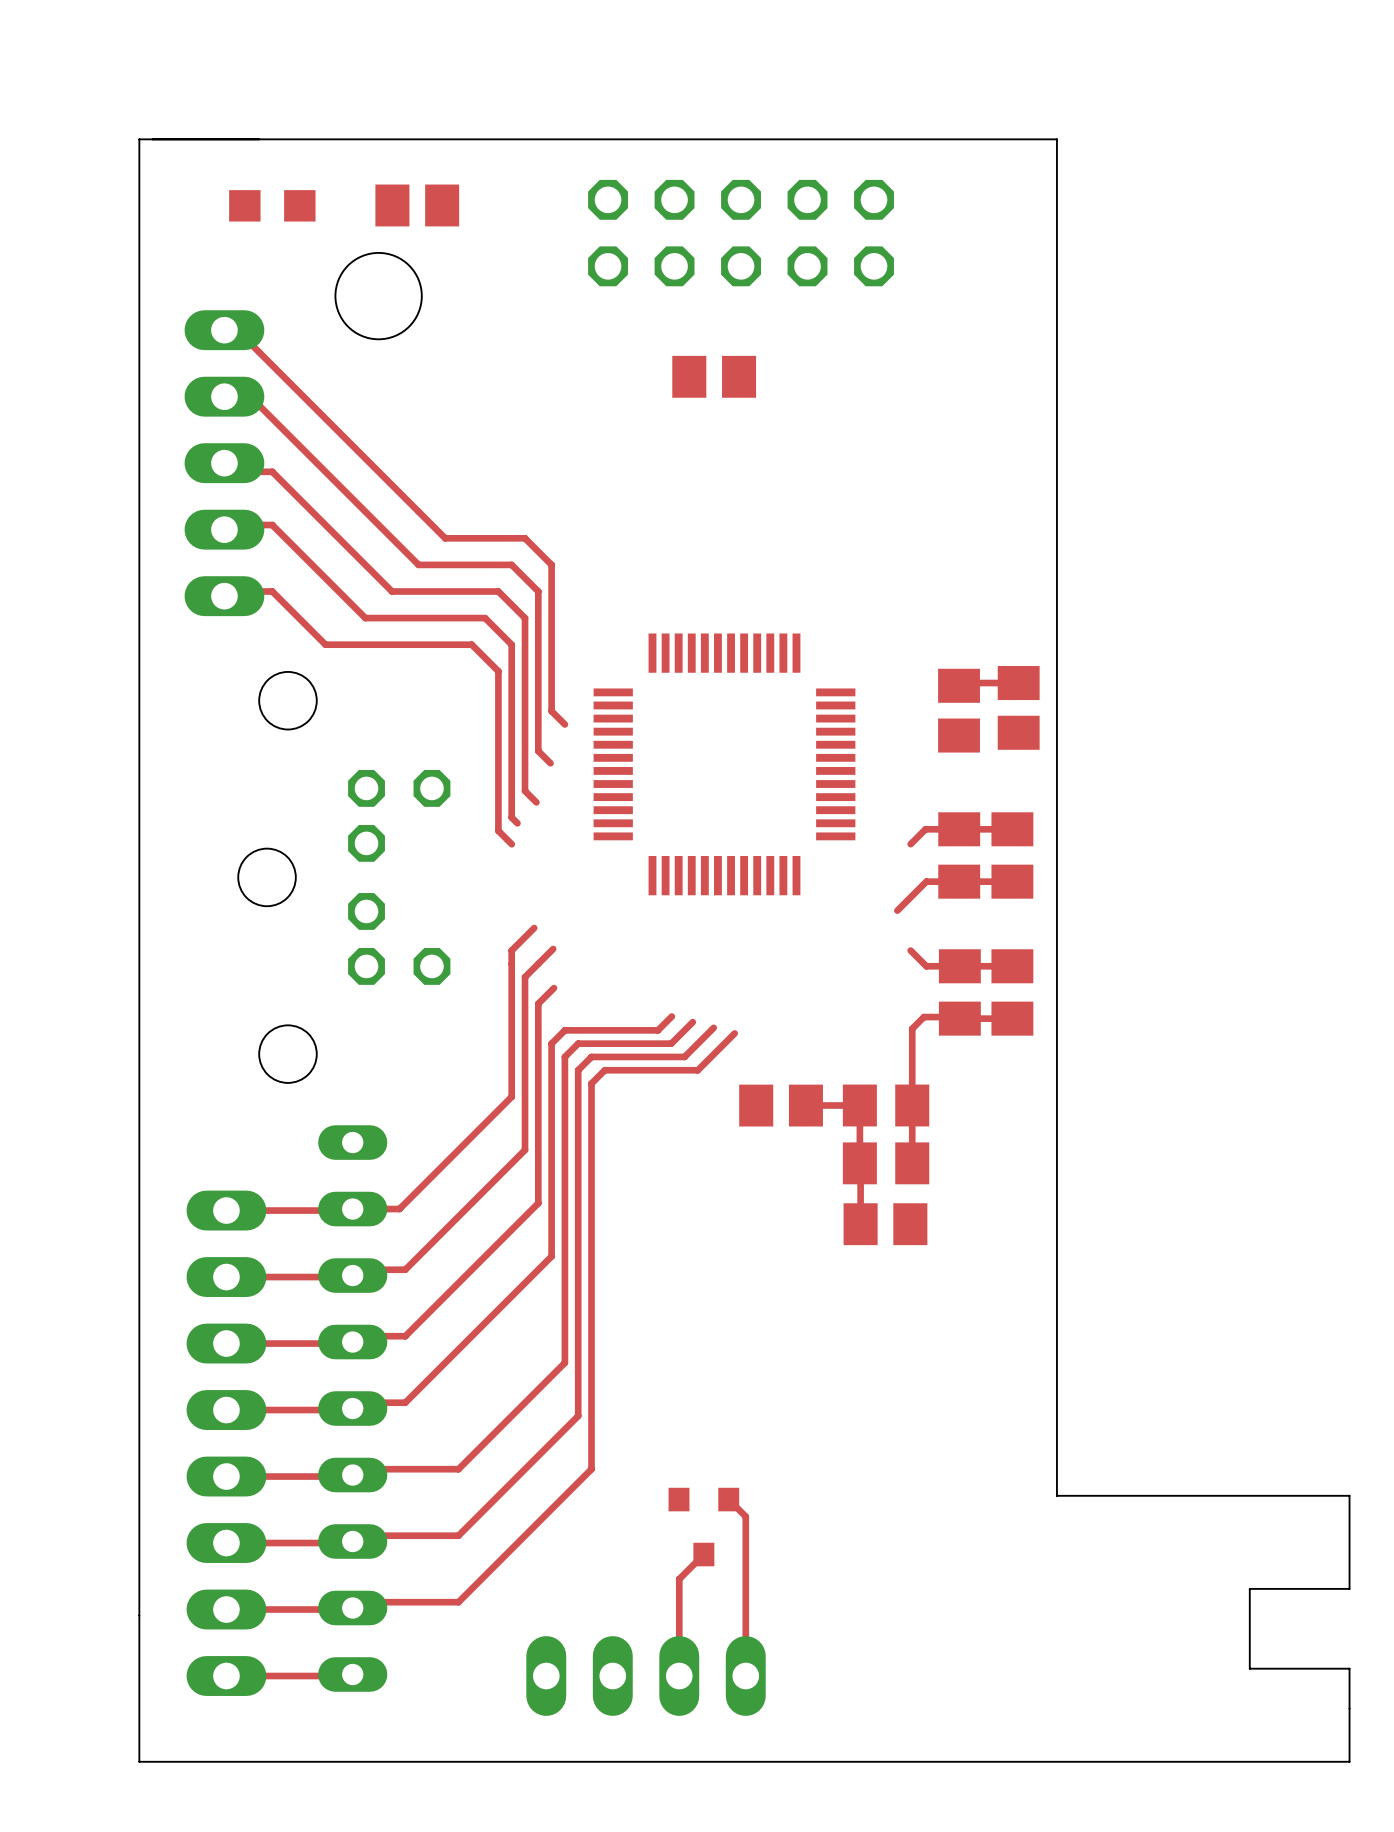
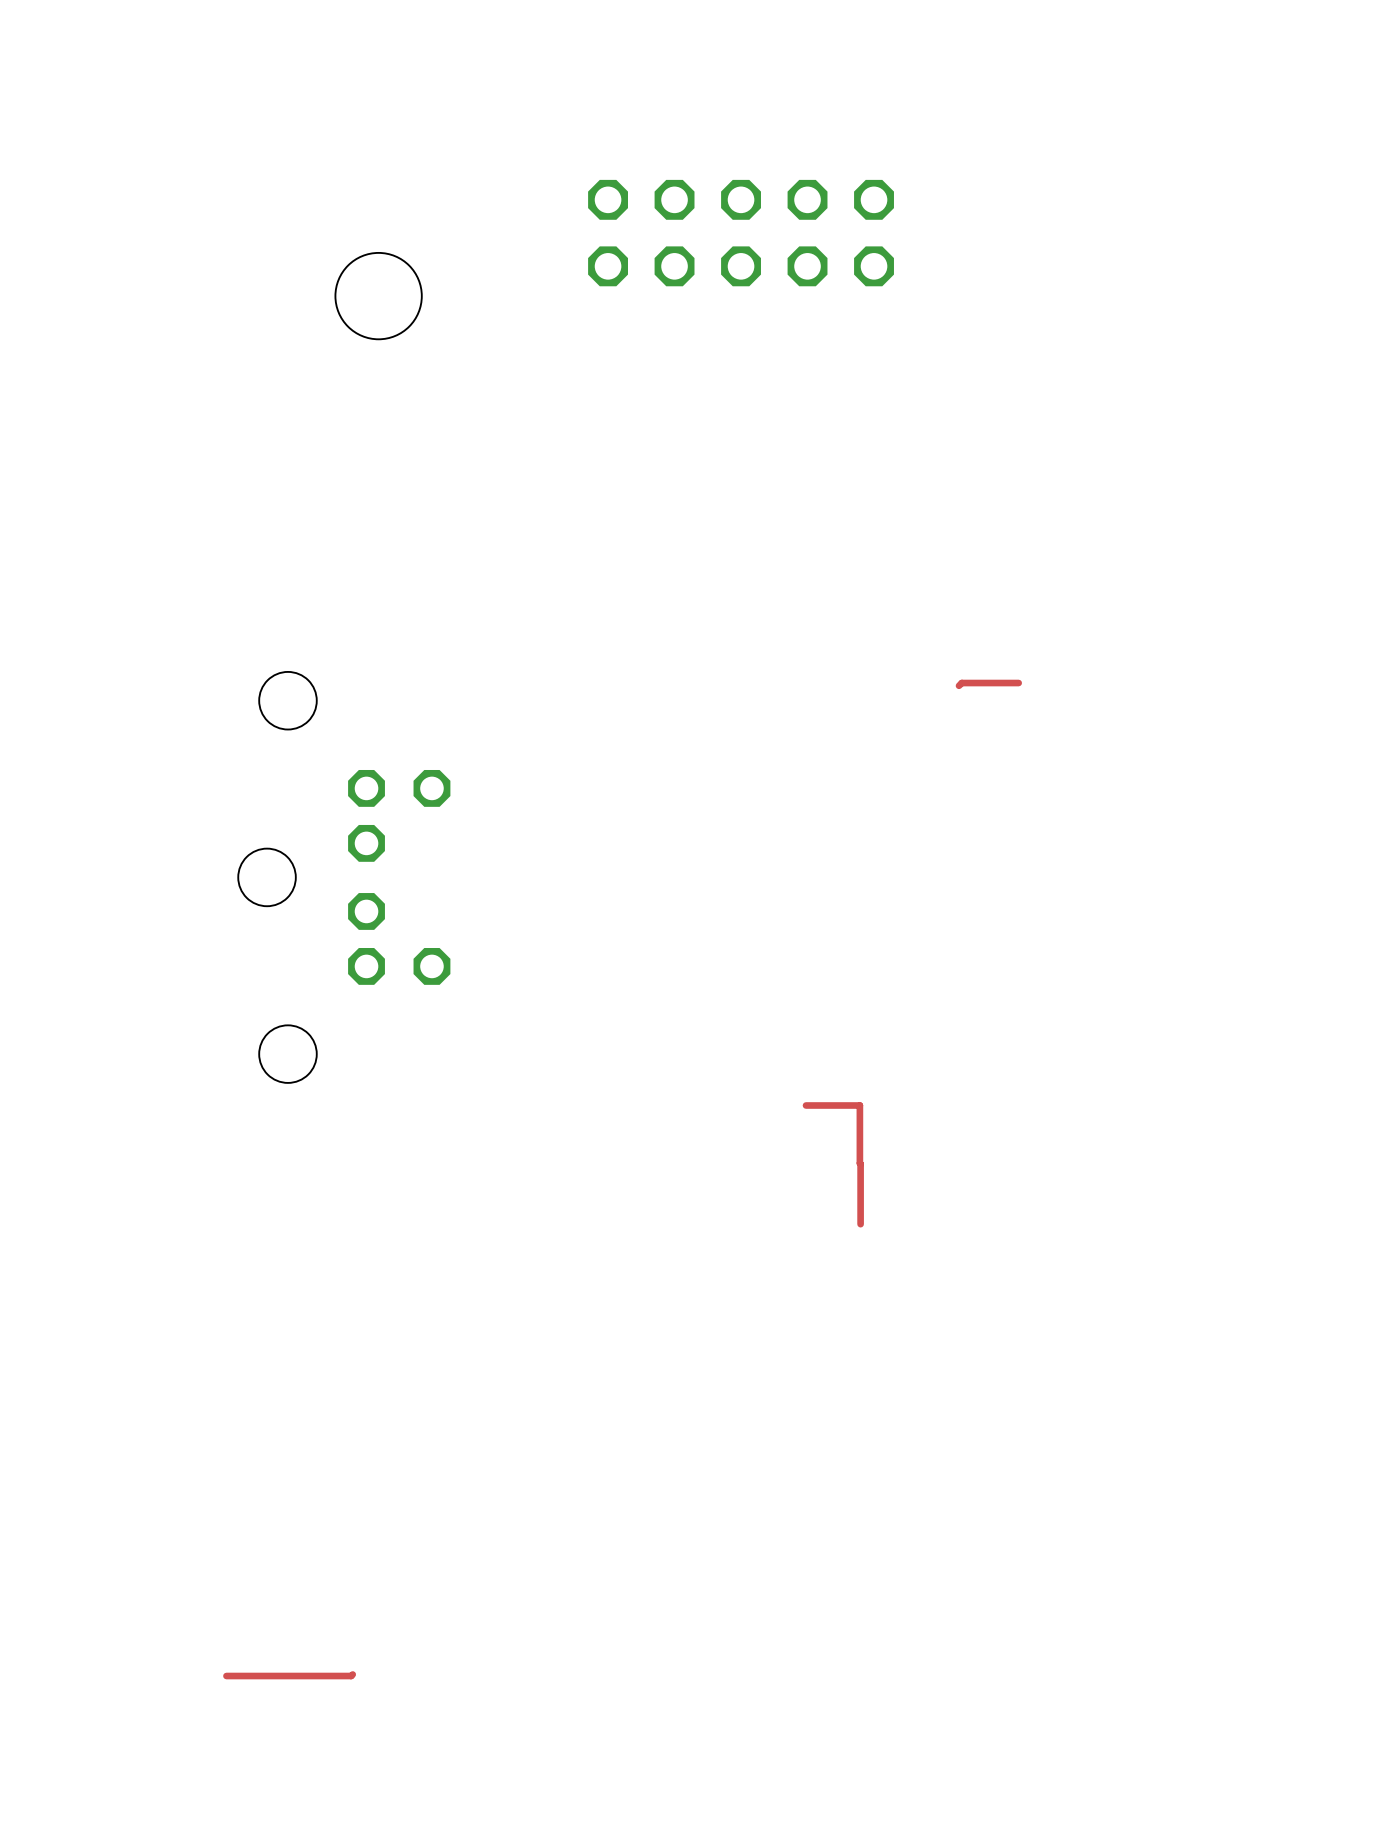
board edge: (1056, 139) (139, 139) (139, 1761) (1349, 1761) (1349, 1668) (1249, 1668) (1249, 1588) (1349, 1588) (1349, 1495) (1056, 1495) (1056, 139) -> none
part: (272, 205) -> none
part: (417, 205) -> none
top track: (224, 330) (233, 338) (245, 338) (445, 538) (525, 538) (551, 564) (551, 711) (564, 724) -> none
part: (714, 376) -> none
top track: (224, 396) (233, 405) (259, 405) (418, 564) (511, 564) (538, 591) (538, 751) (550, 763) -> none
top track: (224, 463) (233, 471) (272, 471) (392, 591) (498, 591) (525, 618) (525, 790) (536, 802) -> none
part: (224, 463) -> none
top track: (224, 529) (229, 525) (272, 525) (365, 618) (485, 618) (511, 644) (511, 817) (517, 823) -> none
top track: (224, 596) (229, 591) (272, 591) (325, 644) (471, 644) (498, 671) (498, 830) (511, 844) -> none
part: (1018, 707) -> none
part: (959, 710) -> none
part: (724, 764) -> none
top track: (1012, 829) (925, 829) (910, 844) -> none
part: (959, 855) -> none
part: (1012, 855) -> none
top track: (1012, 881) (926, 881) (897, 910) -> none
top track: (534, 928) (511, 950) (511, 1096) (399, 1209) (226, 1210) -> none
top track: (553, 948) (525, 977) (525, 1150) (405, 1269) (358, 1269) (351, 1277) (226, 1277) -> none
top track: (910, 950) (926, 966) (1012, 966) -> none
top track: (554, 988) (538, 1003) (538, 1203) (405, 1336) (358, 1336) (351, 1343) (226, 1343) -> none
part: (959, 992) -> none
part: (1012, 992) -> none
top track: (671, 1016) (657, 1030) (564, 1030) (551, 1043) (551, 1256) (405, 1402) (358, 1402) (351, 1410) (226, 1410) -> none
top track: (1012, 1018) (923, 1017) (912, 1028) (912, 1163) -> none
top track: (692, 1022) (671, 1043) (578, 1043) (564, 1056) (564, 1362) (458, 1469) (358, 1469) (351, 1476) (226, 1476) -> none
top track: (713, 1027) (684, 1056) (591, 1056) (578, 1070) (578, 1416) (458, 1535) (358, 1535) (351, 1543) (226, 1543) -> none
top track: (734, 1033) (697, 1070) (604, 1070) (591, 1083) (591, 1469) (458, 1602) (358, 1602) (351, 1609) (226, 1609) -> none
part: (781, 1105) -> none
part: (886, 1105) -> none
part: (886, 1163) -> none
part: (885, 1224) -> none
part: (352, 1408) -> none
part: (226, 1443) -> none
top track: (728, 1499) (745, 1516) (745, 1676) -> none
part: (703, 1527) -> none
top track: (703, 1554) (679, 1579) (679, 1676) -> none
part: (646, 1676) -> none

